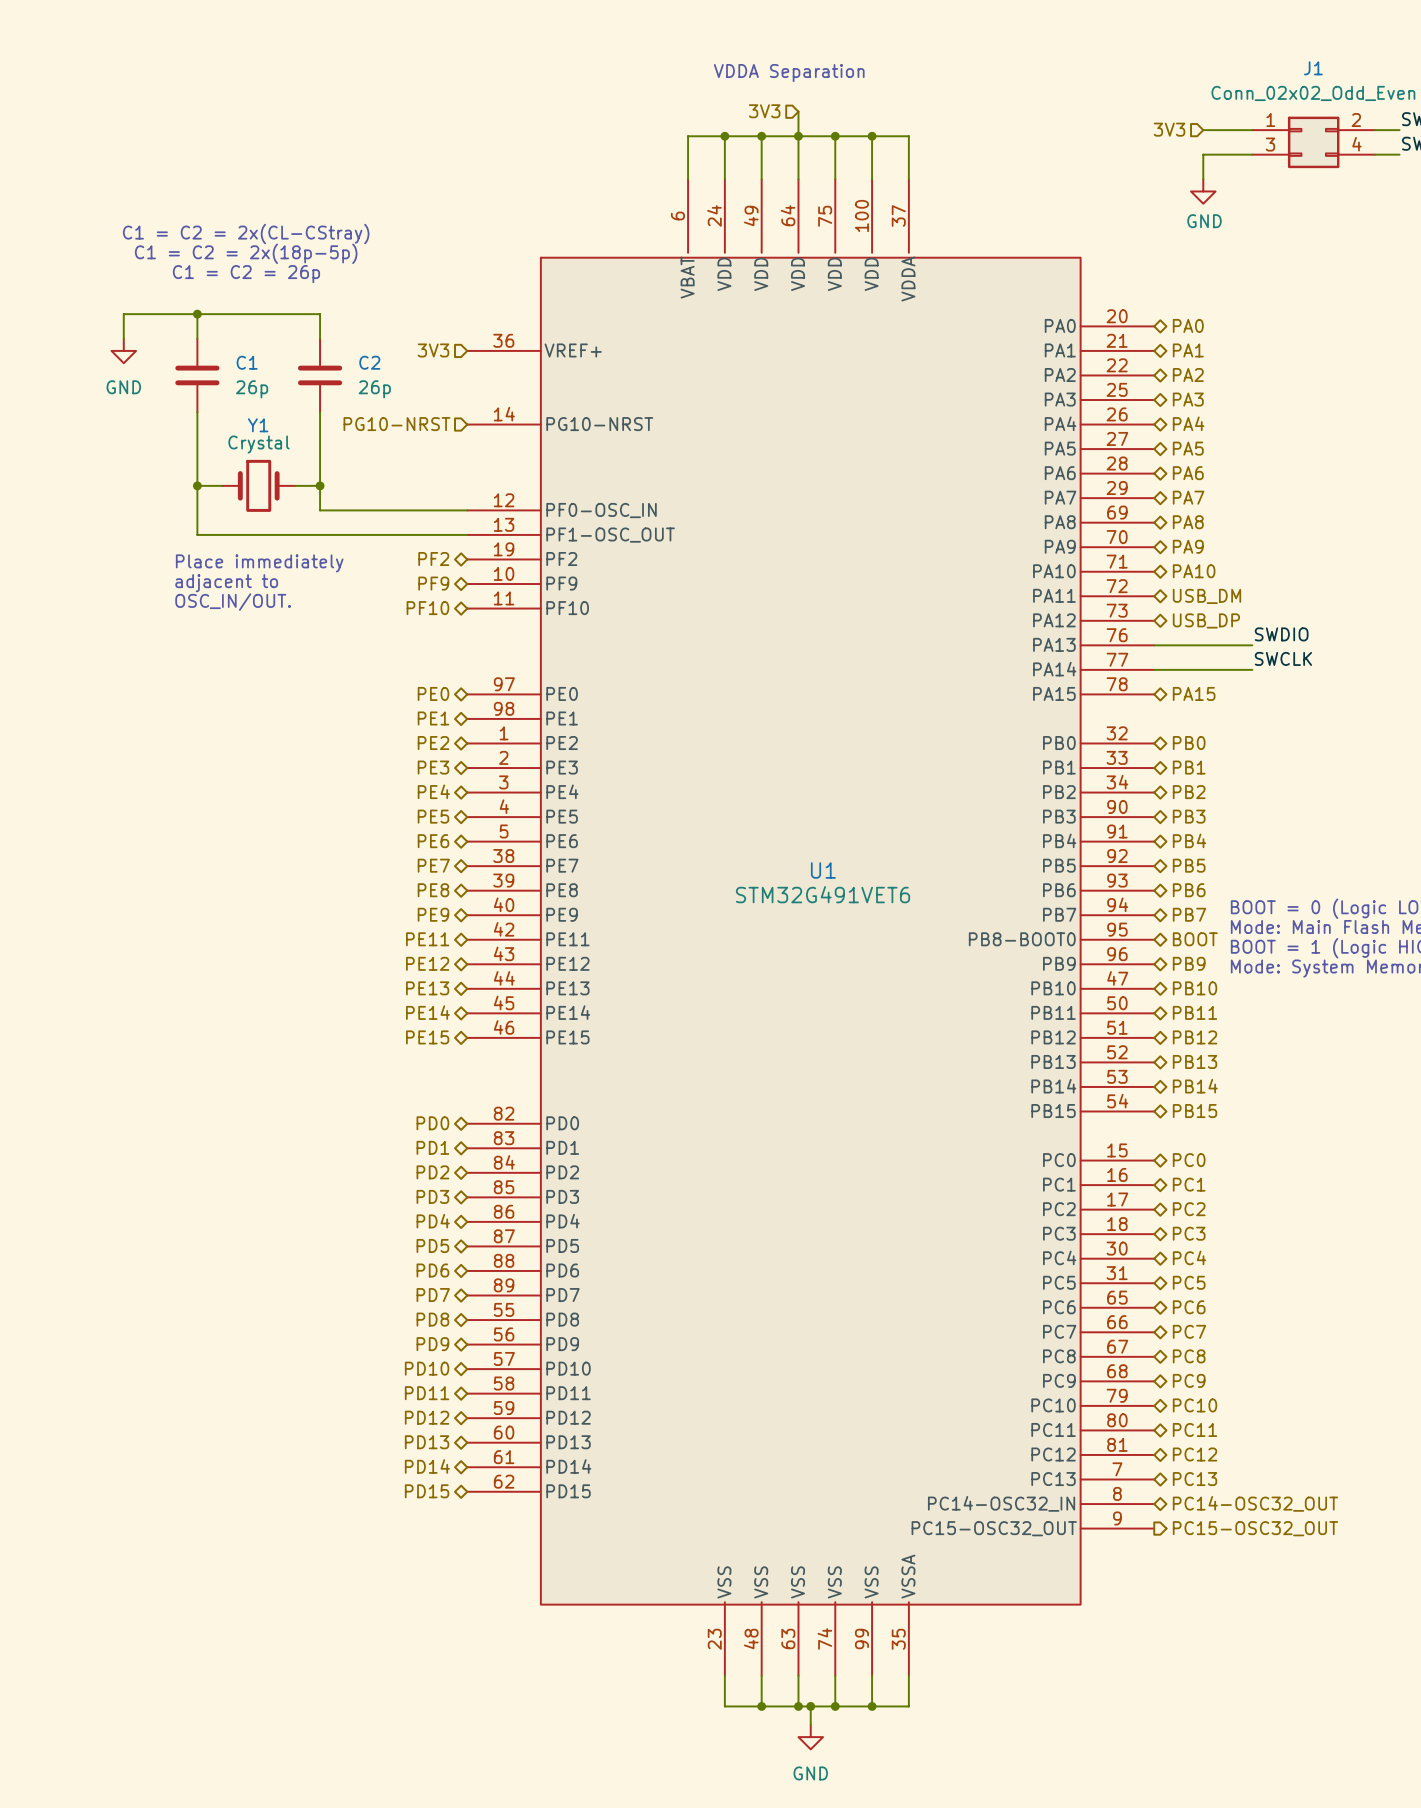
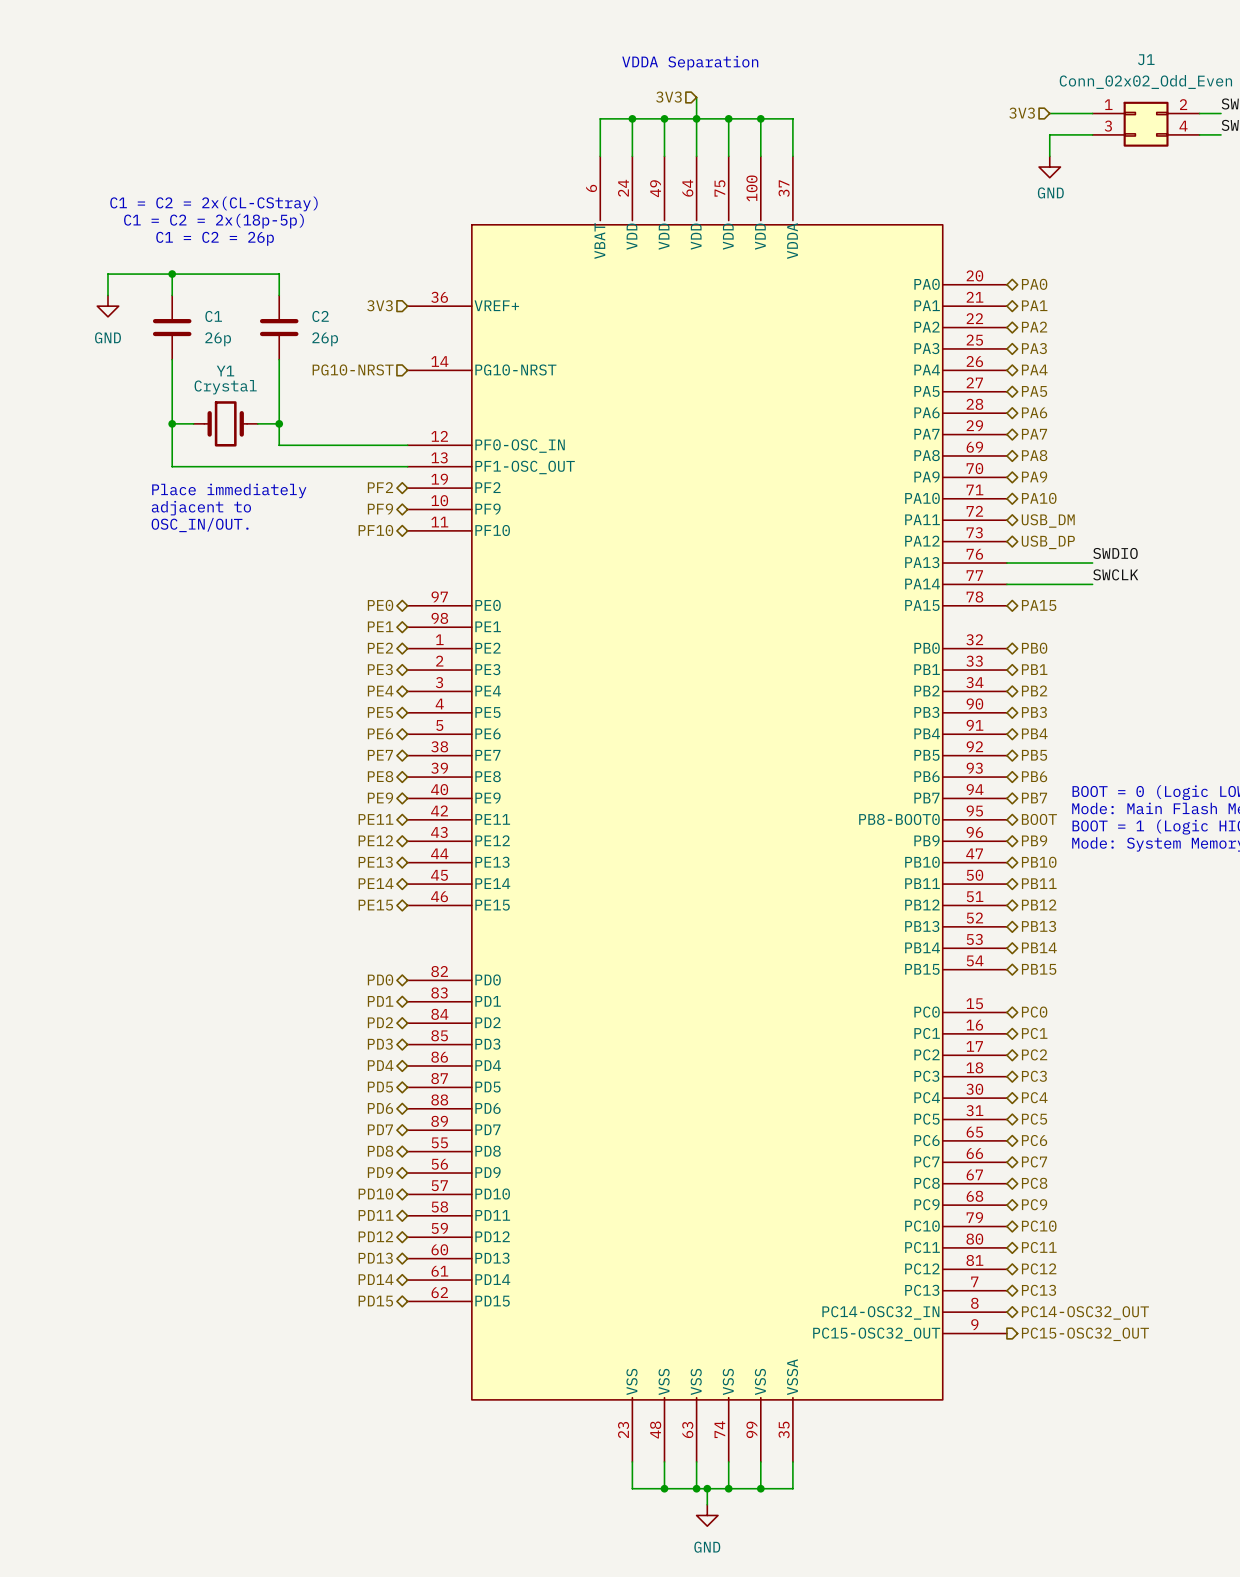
U1 name: U1 (823, 870) -> none
U1 value: STM32G491VET6 (823, 894) -> none

